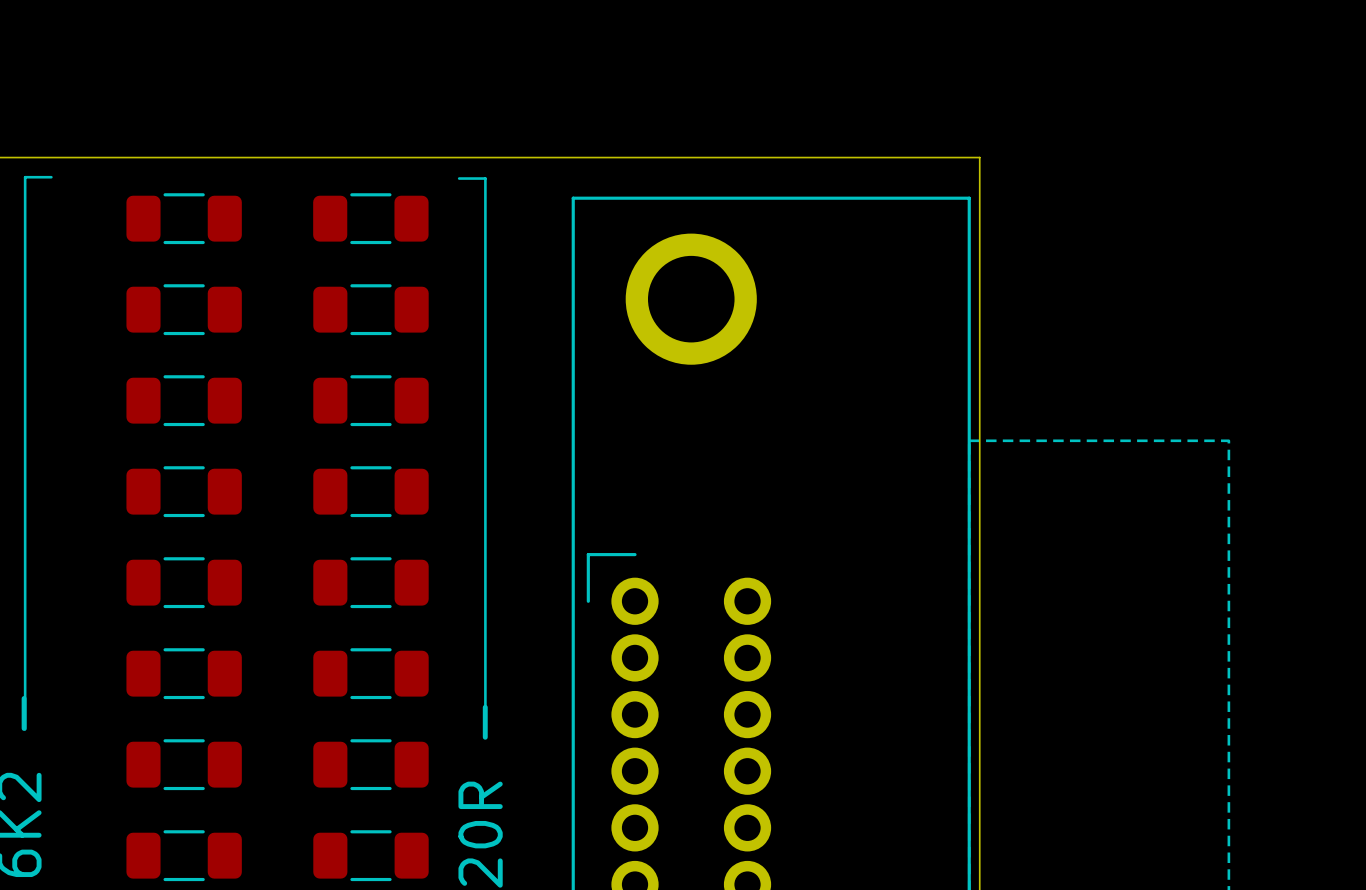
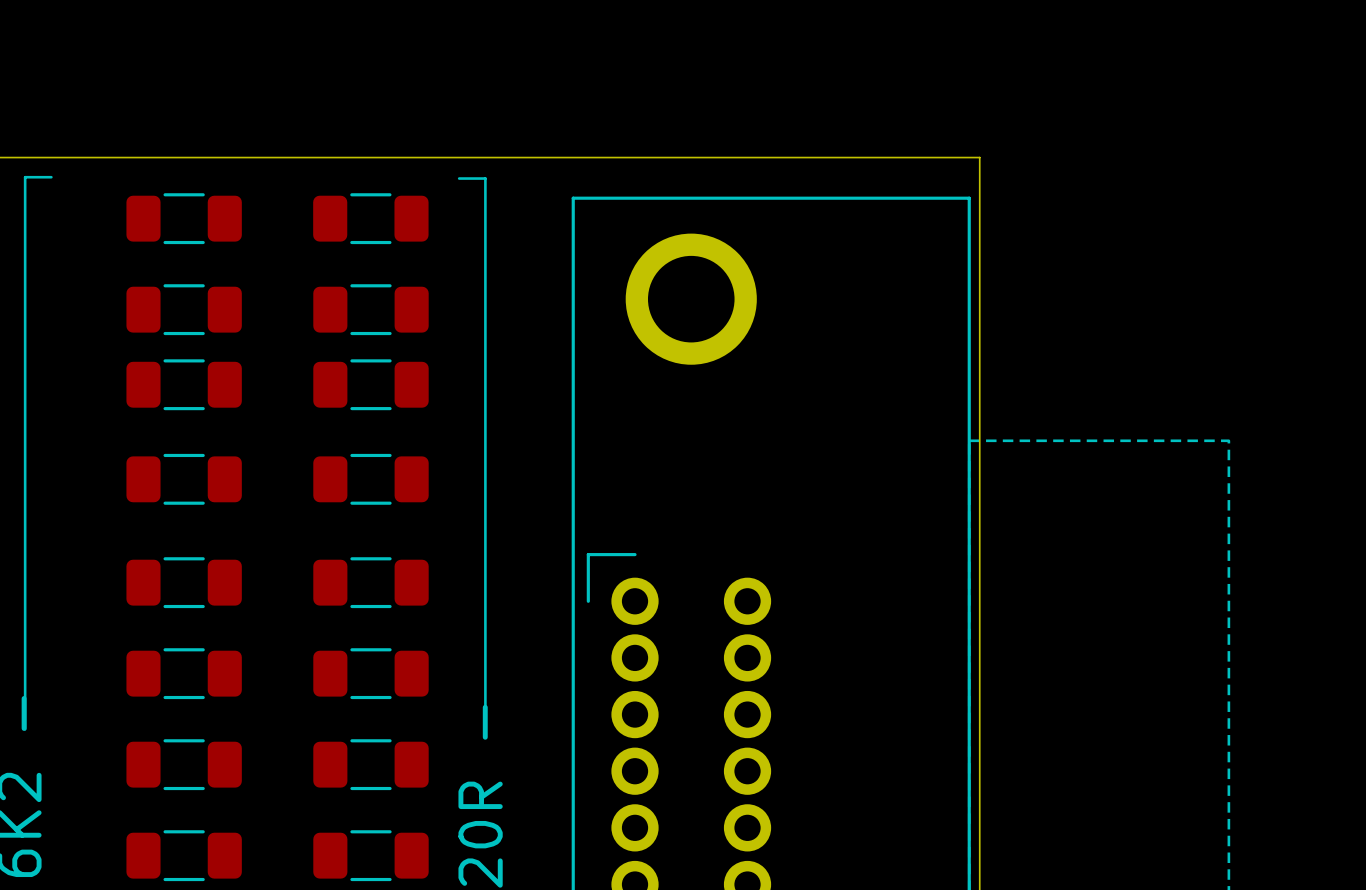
part position: (184, 400) -> (184, 384)
part position: (370, 400) -> (370, 384)
part position: (184, 491) -> (184, 479)
part position: (370, 491) -> (370, 479)

